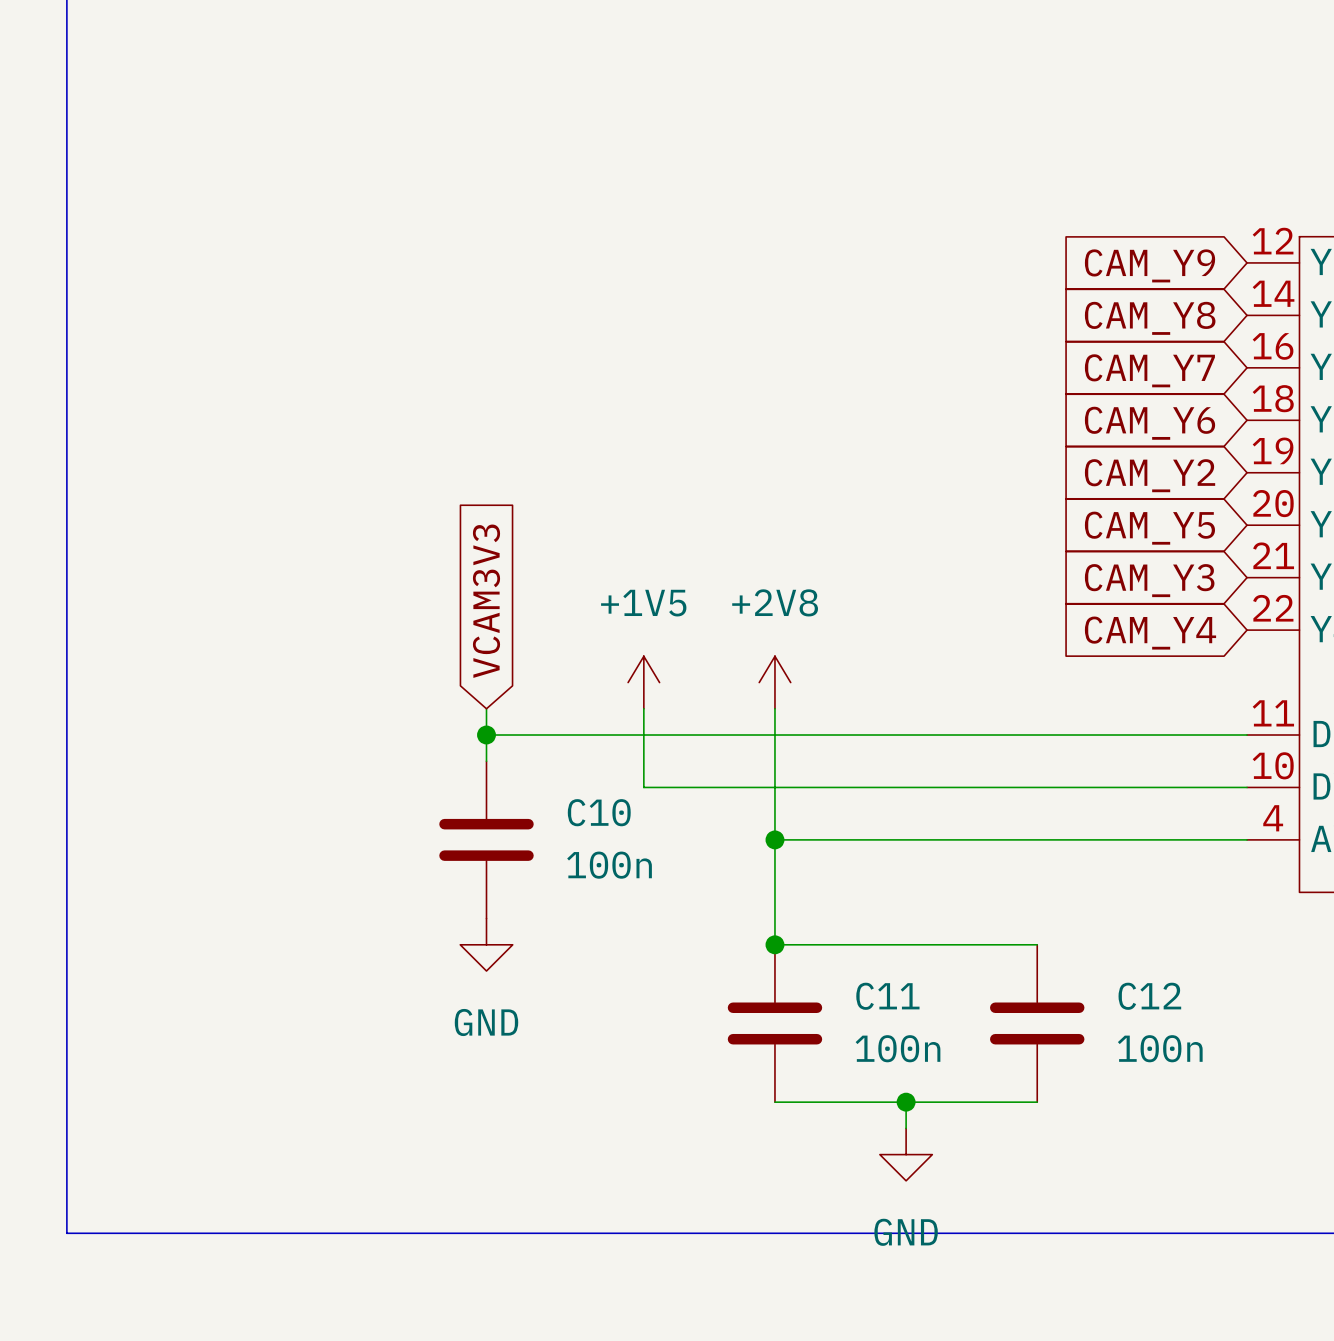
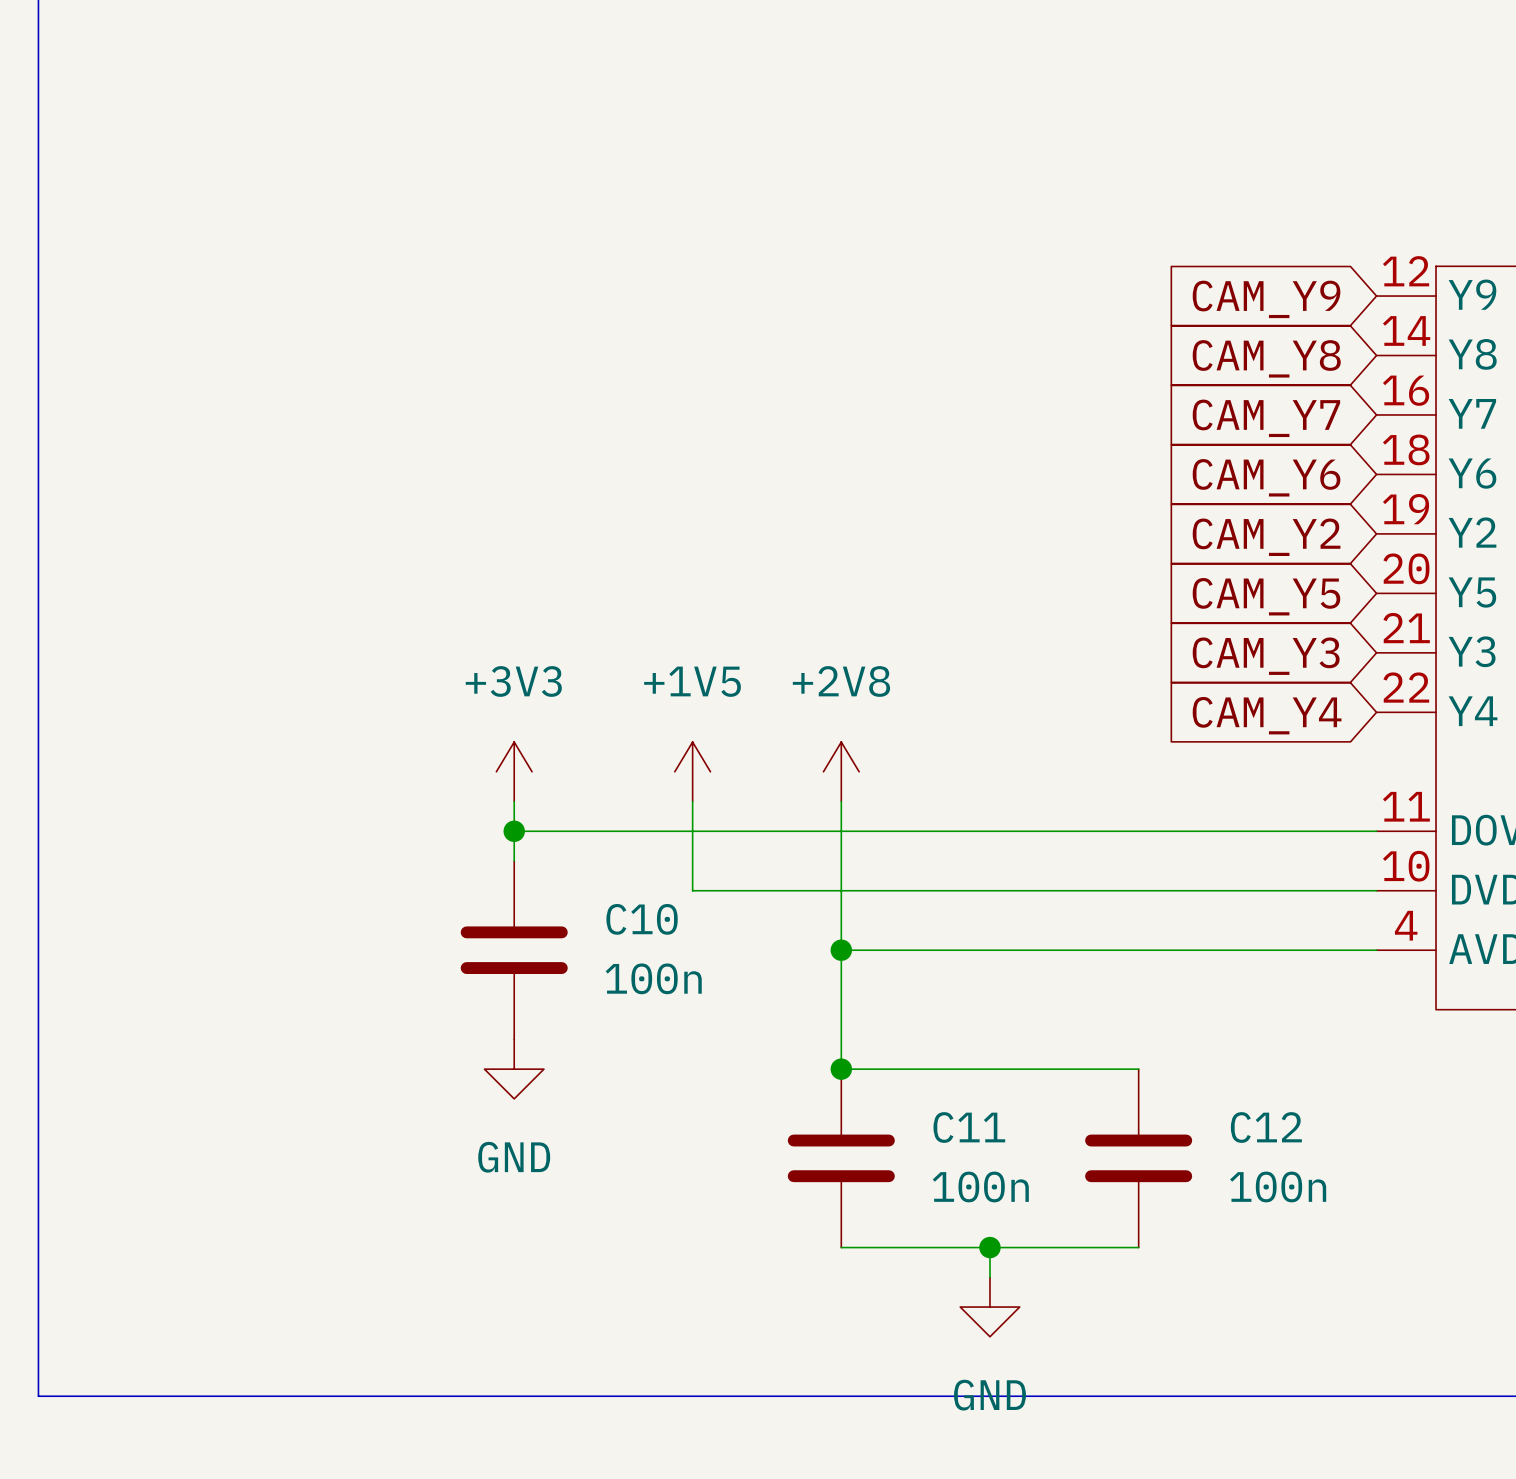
global label: VCAM3V3 (486, 601) -> none
power symbol: none -> +3V3 (514, 771)

